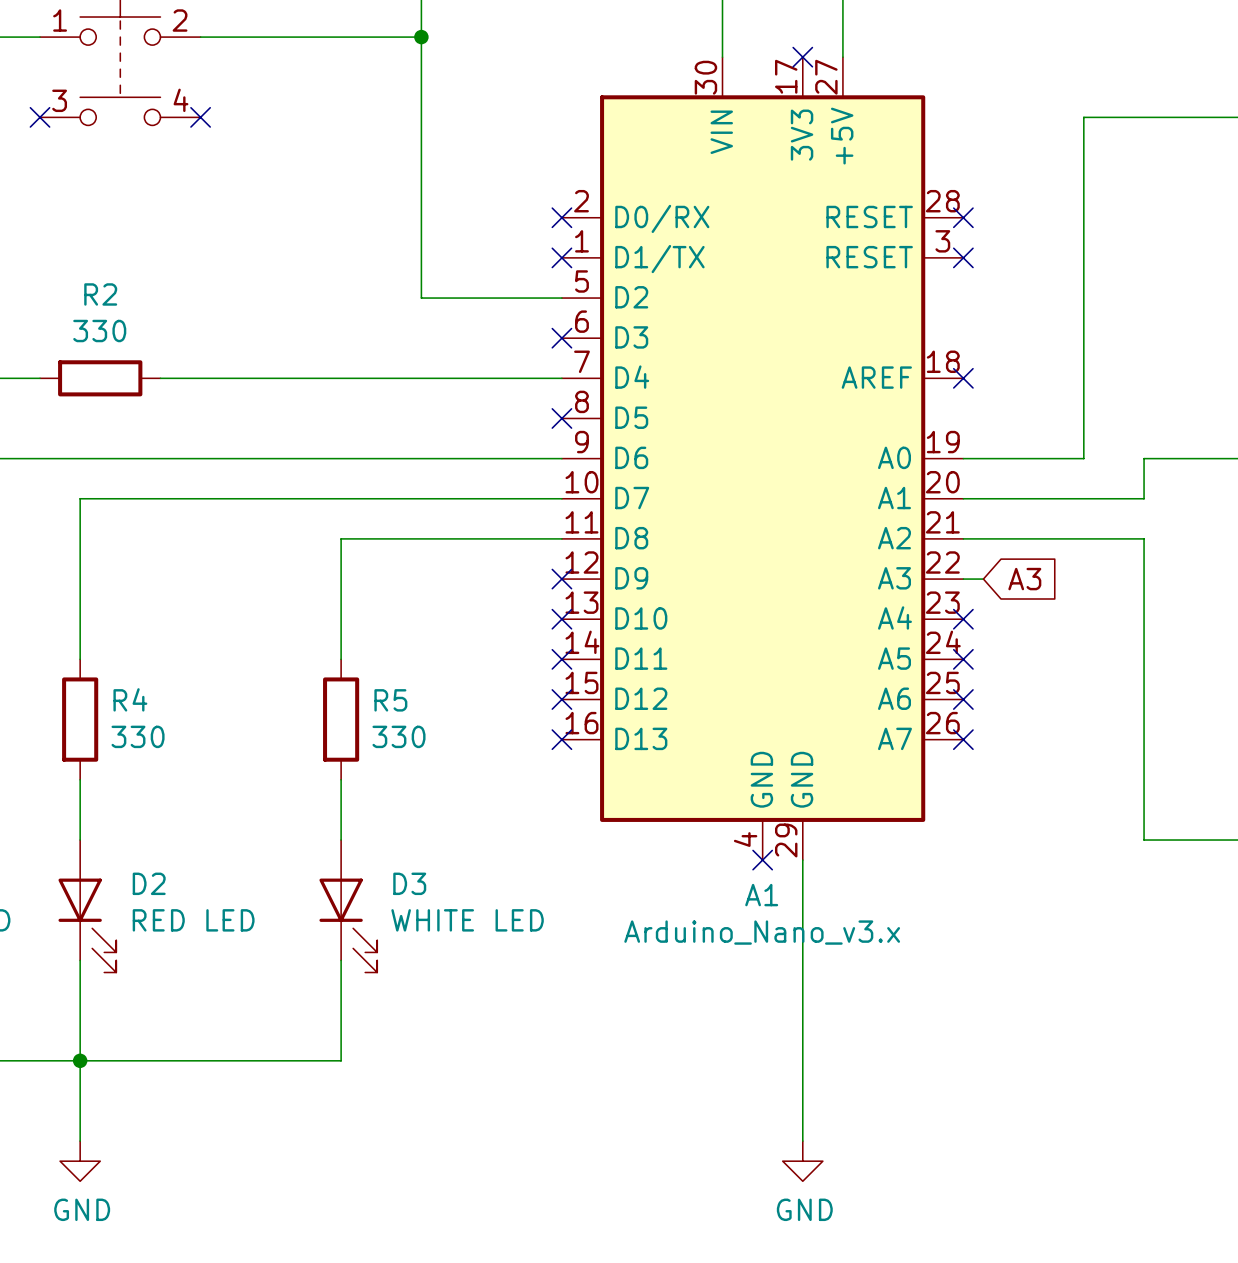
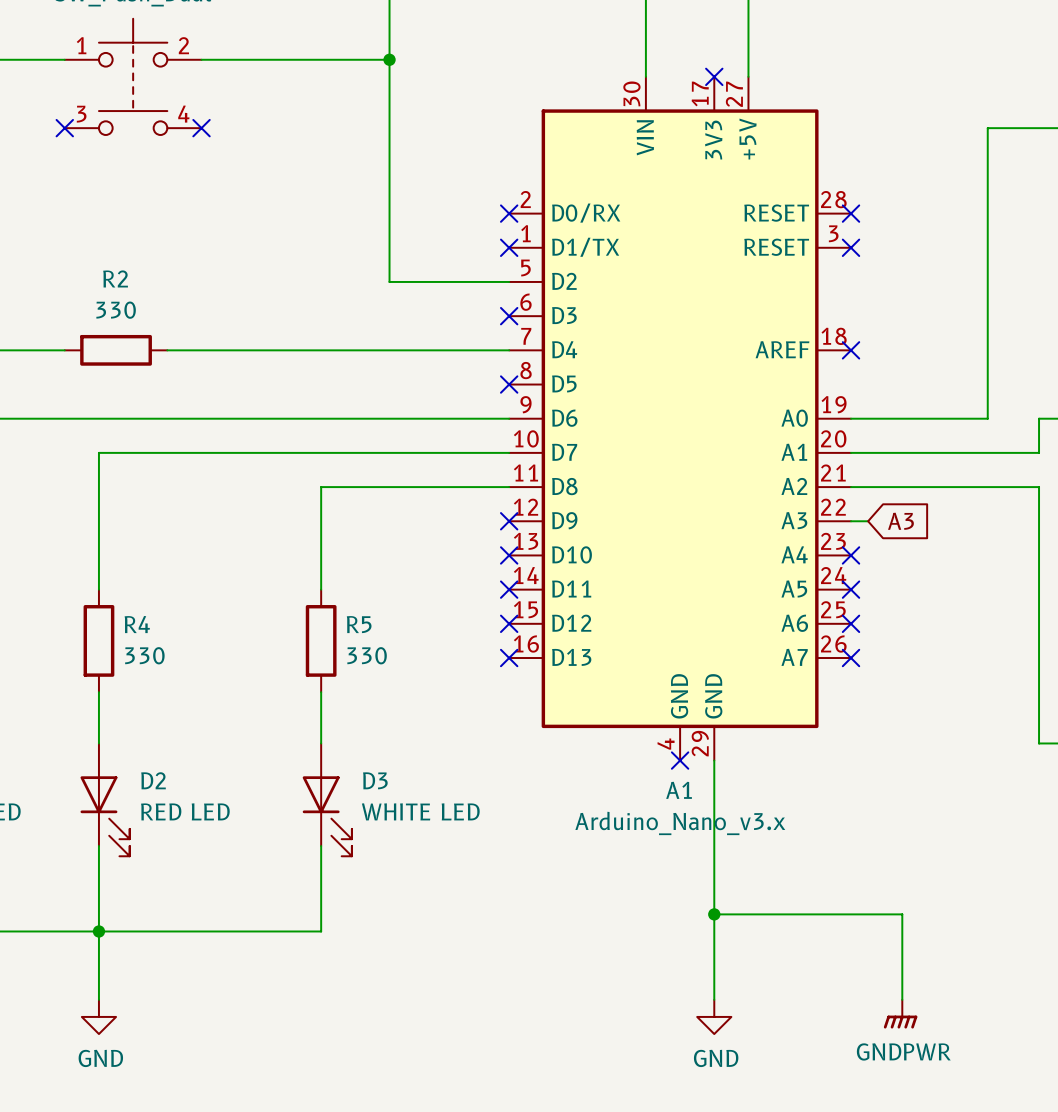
wire: (1123, 117) (1083, 117) (1083, 458) -> (987, 128) (987, 418) (953, 418)
wire: (1184, 458) (1144, 458) (1144, 498) -> (1039, 418) (1039, 452) (1004, 452)
wire: (1144, 538) (1144, 840) (1184, 840) -> (1004, 487) (1039, 487) (1039, 743)
wire: none -> (714, 914) (902, 914) (902, 999)
junction: none -> (714, 914)
power symbol: none -> GNDPWR (900, 1014)

